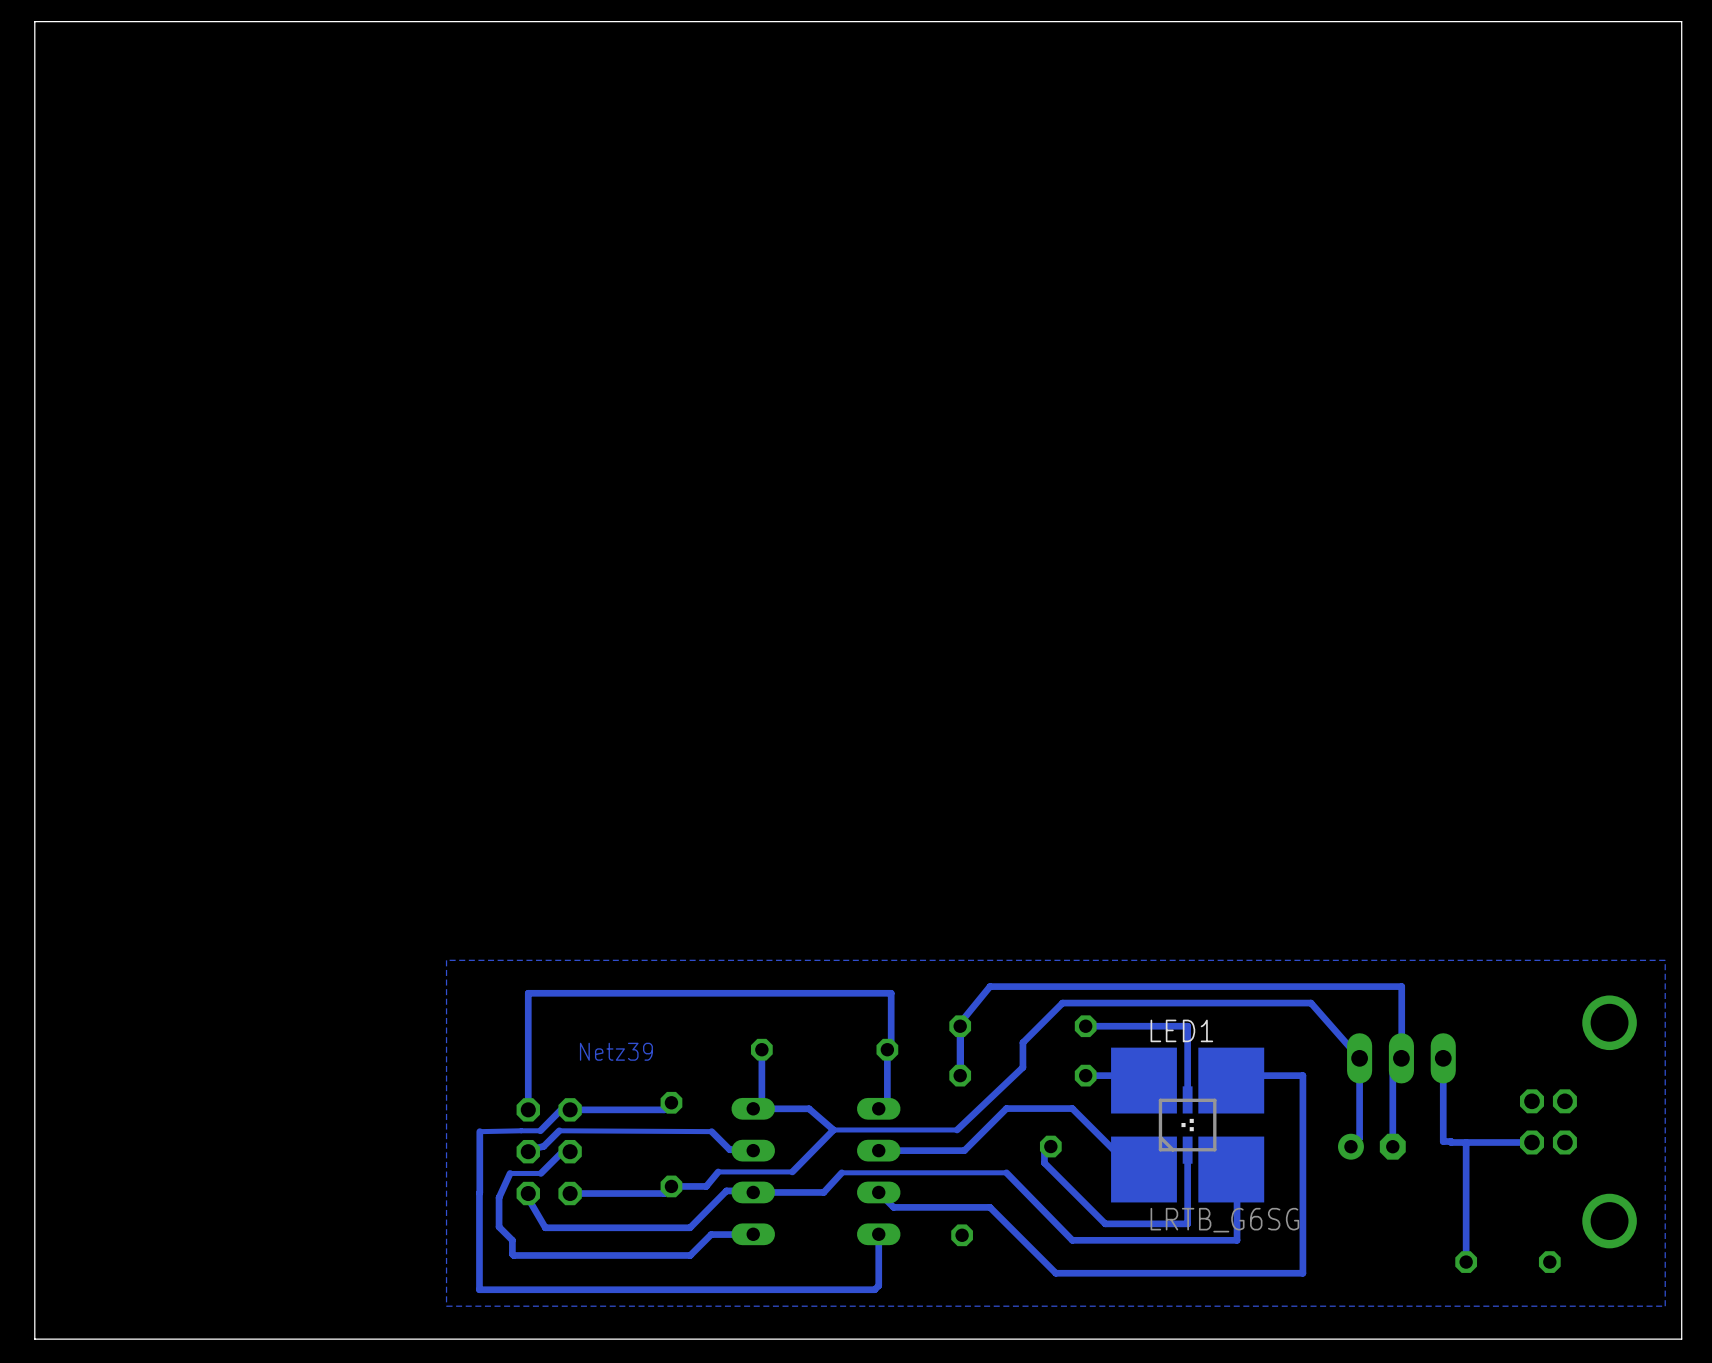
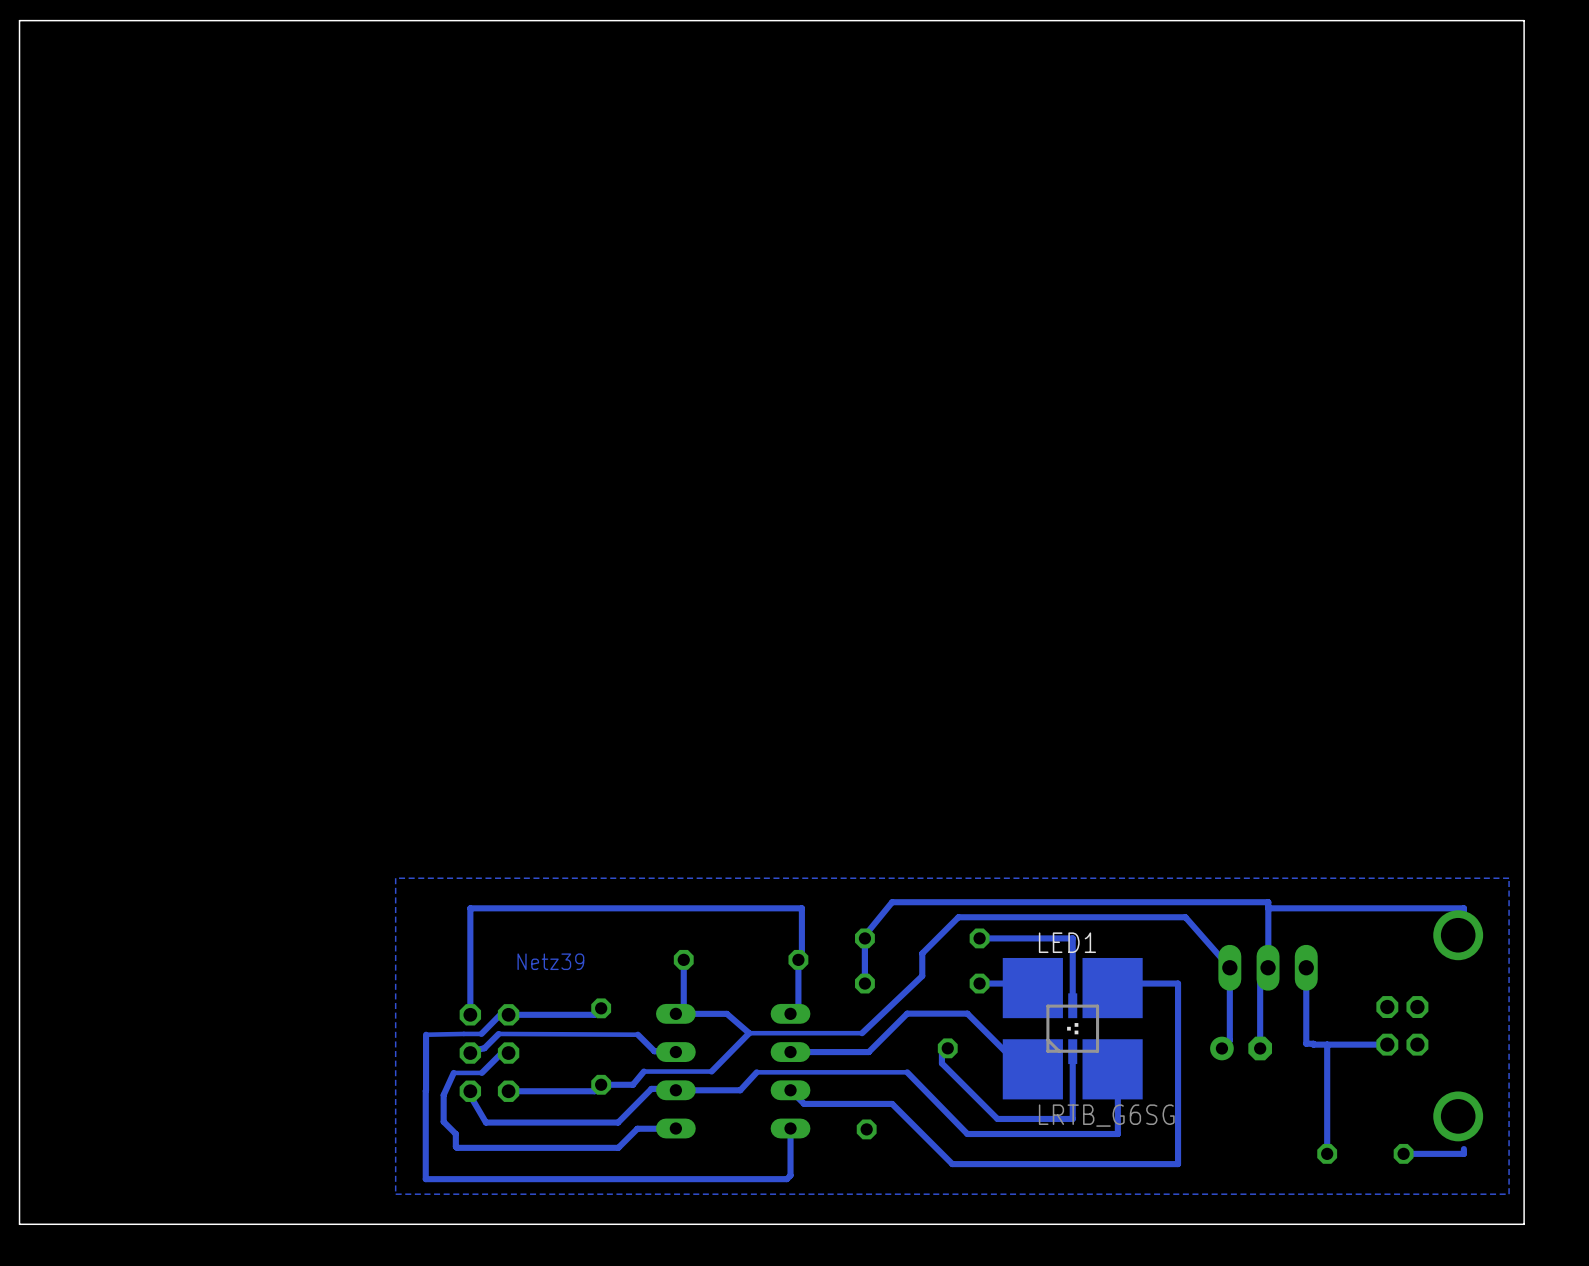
track: none -> (1268, 908) (1463, 908) (1463, 935) (1458, 935)
track: none -> (1463, 1149) (1463, 1153) (1403, 1153)

